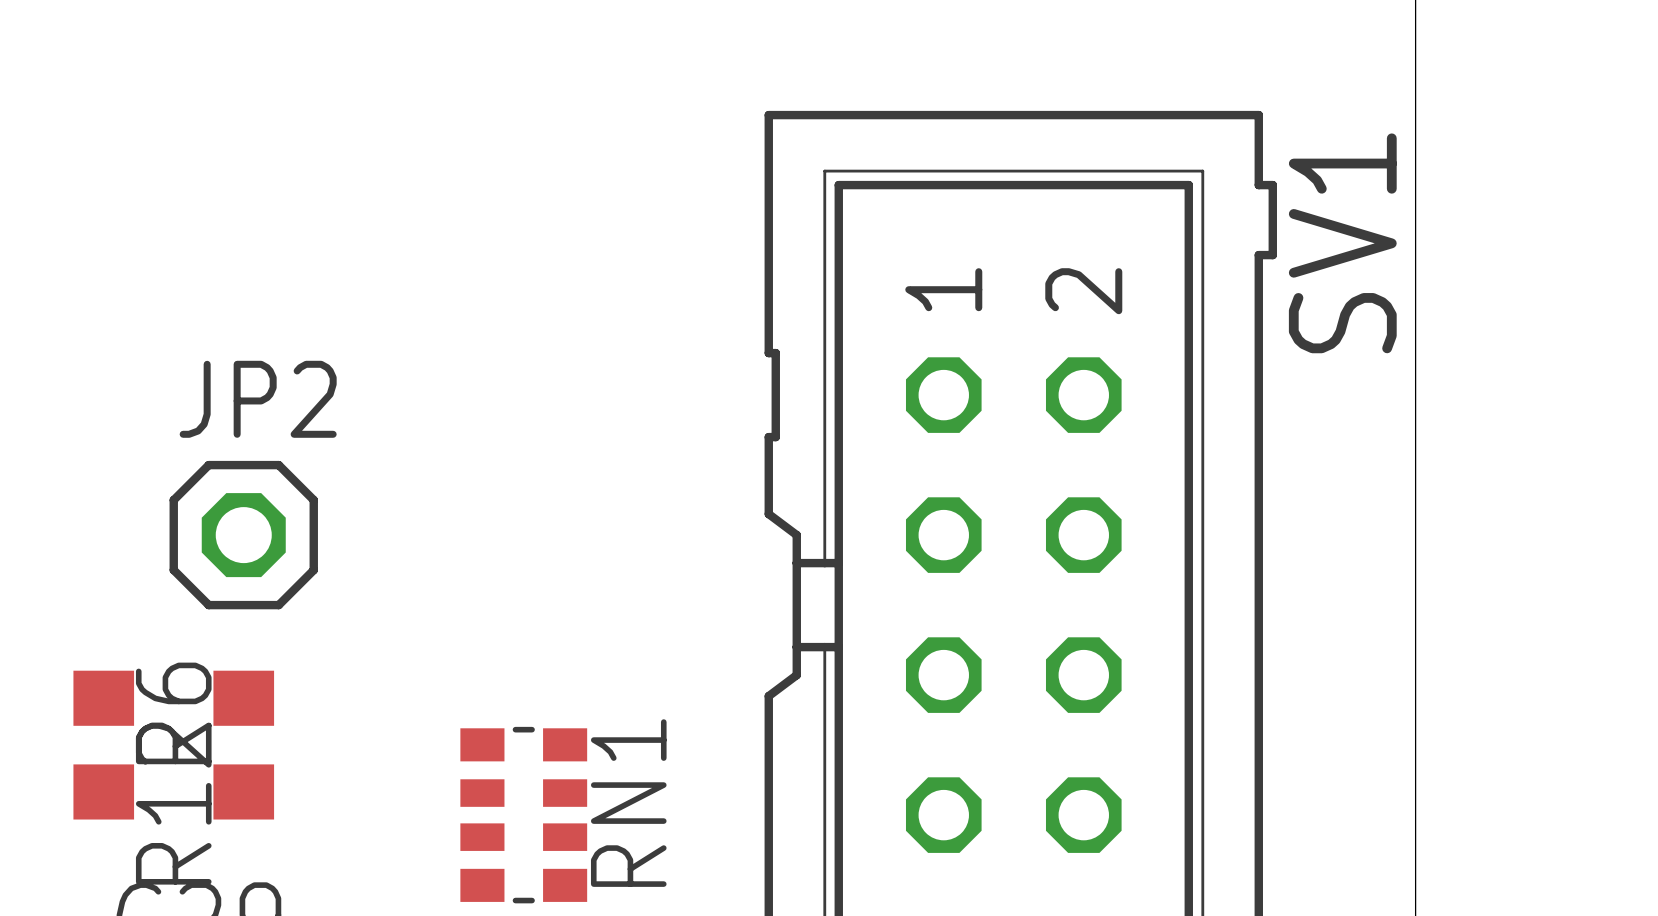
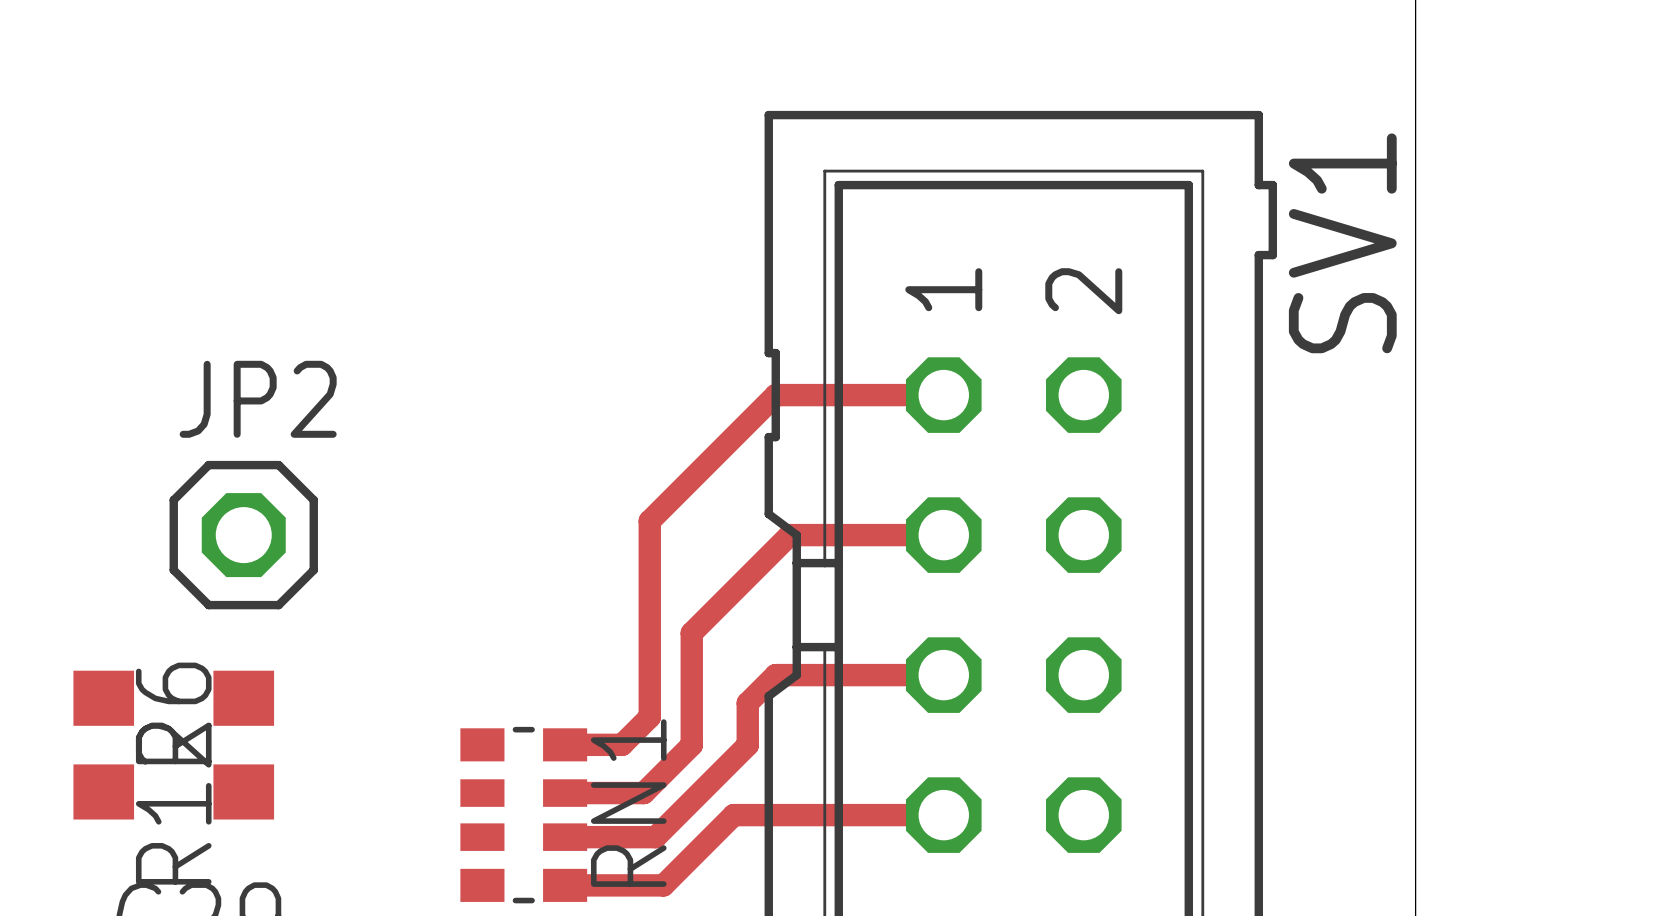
top track: none -> (943, 395) (775, 395) (649, 521) (649, 717) (622, 744) (565, 744)
top track: none -> (943, 535) (789, 535) (691, 633) (691, 745) (643, 793) (565, 793)
top track: none -> (943, 675) (775, 675) (747, 703) (747, 745) (655, 837) (565, 837)
top track: none -> (943, 815) (733, 815) (663, 885) (565, 885)

